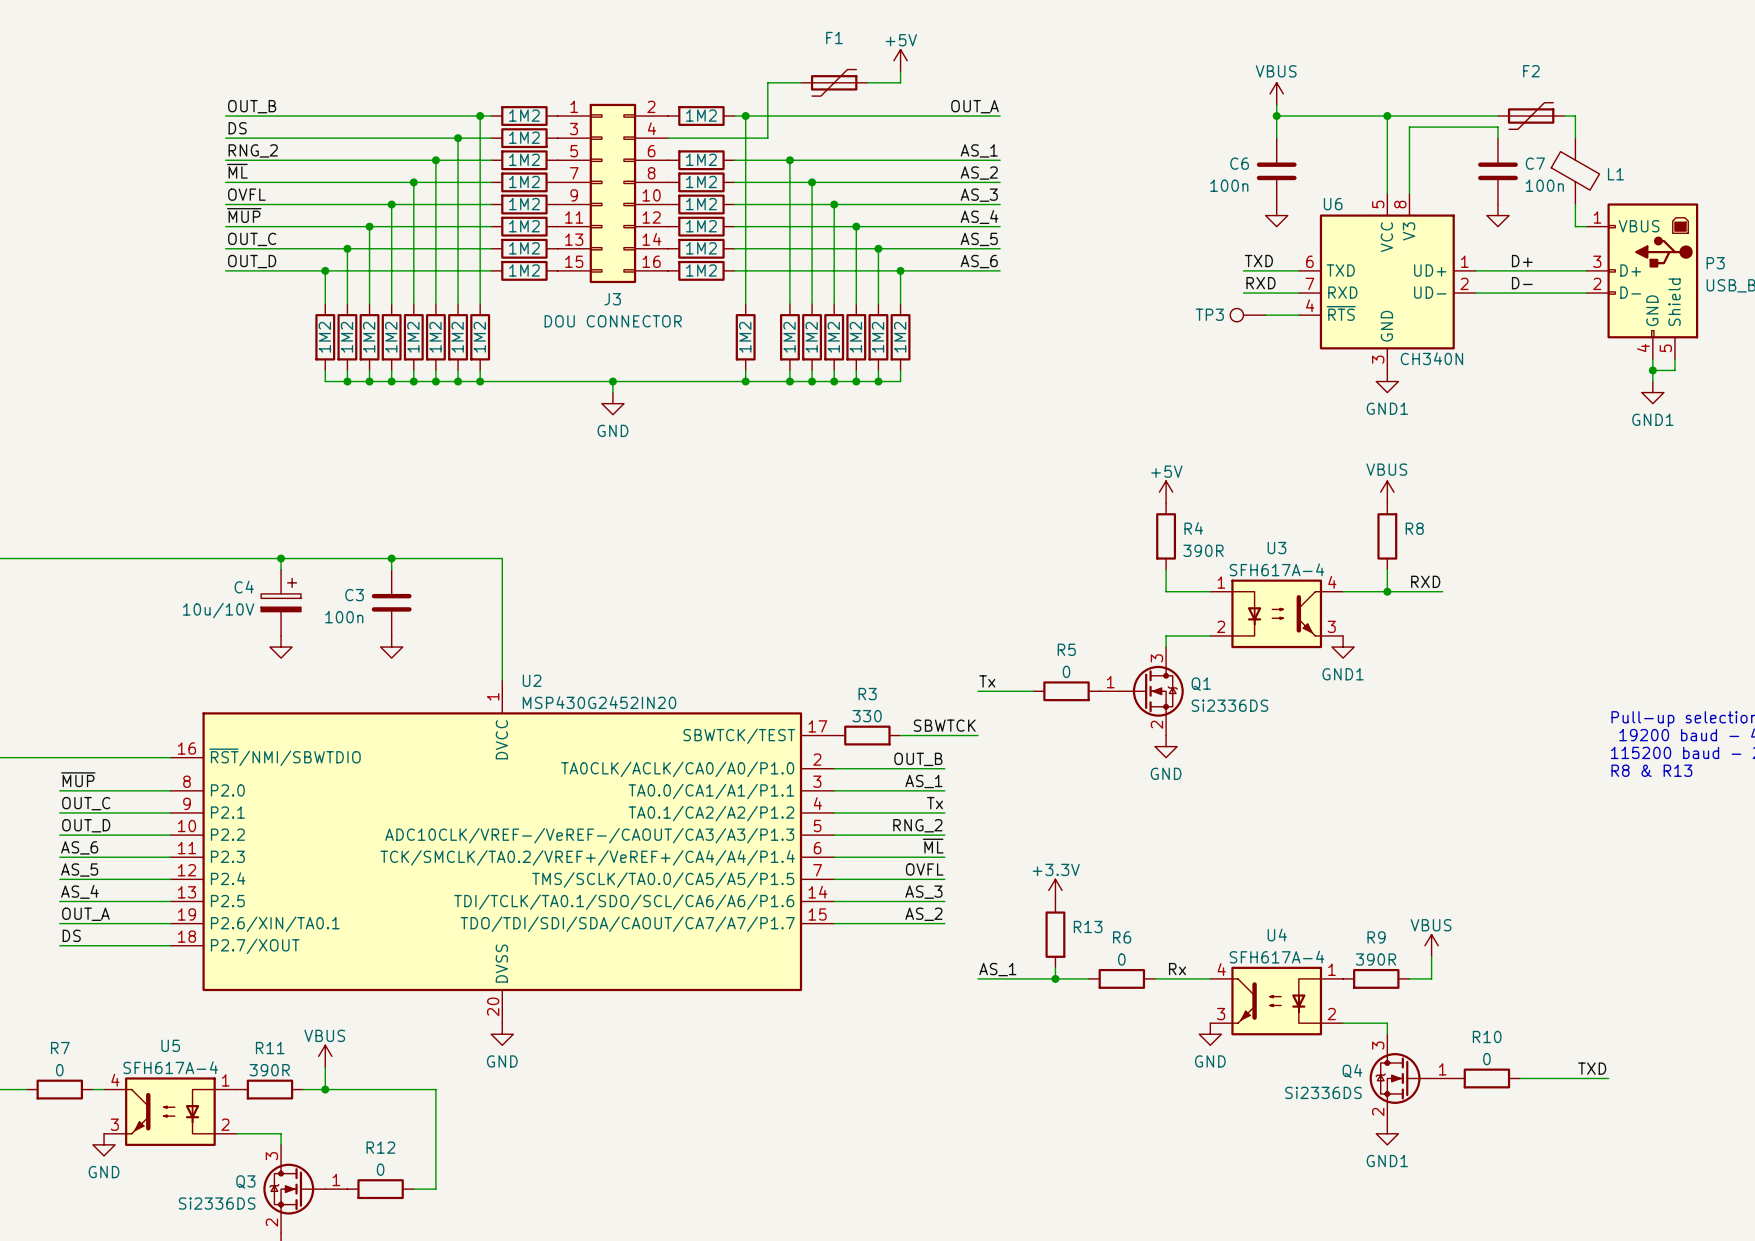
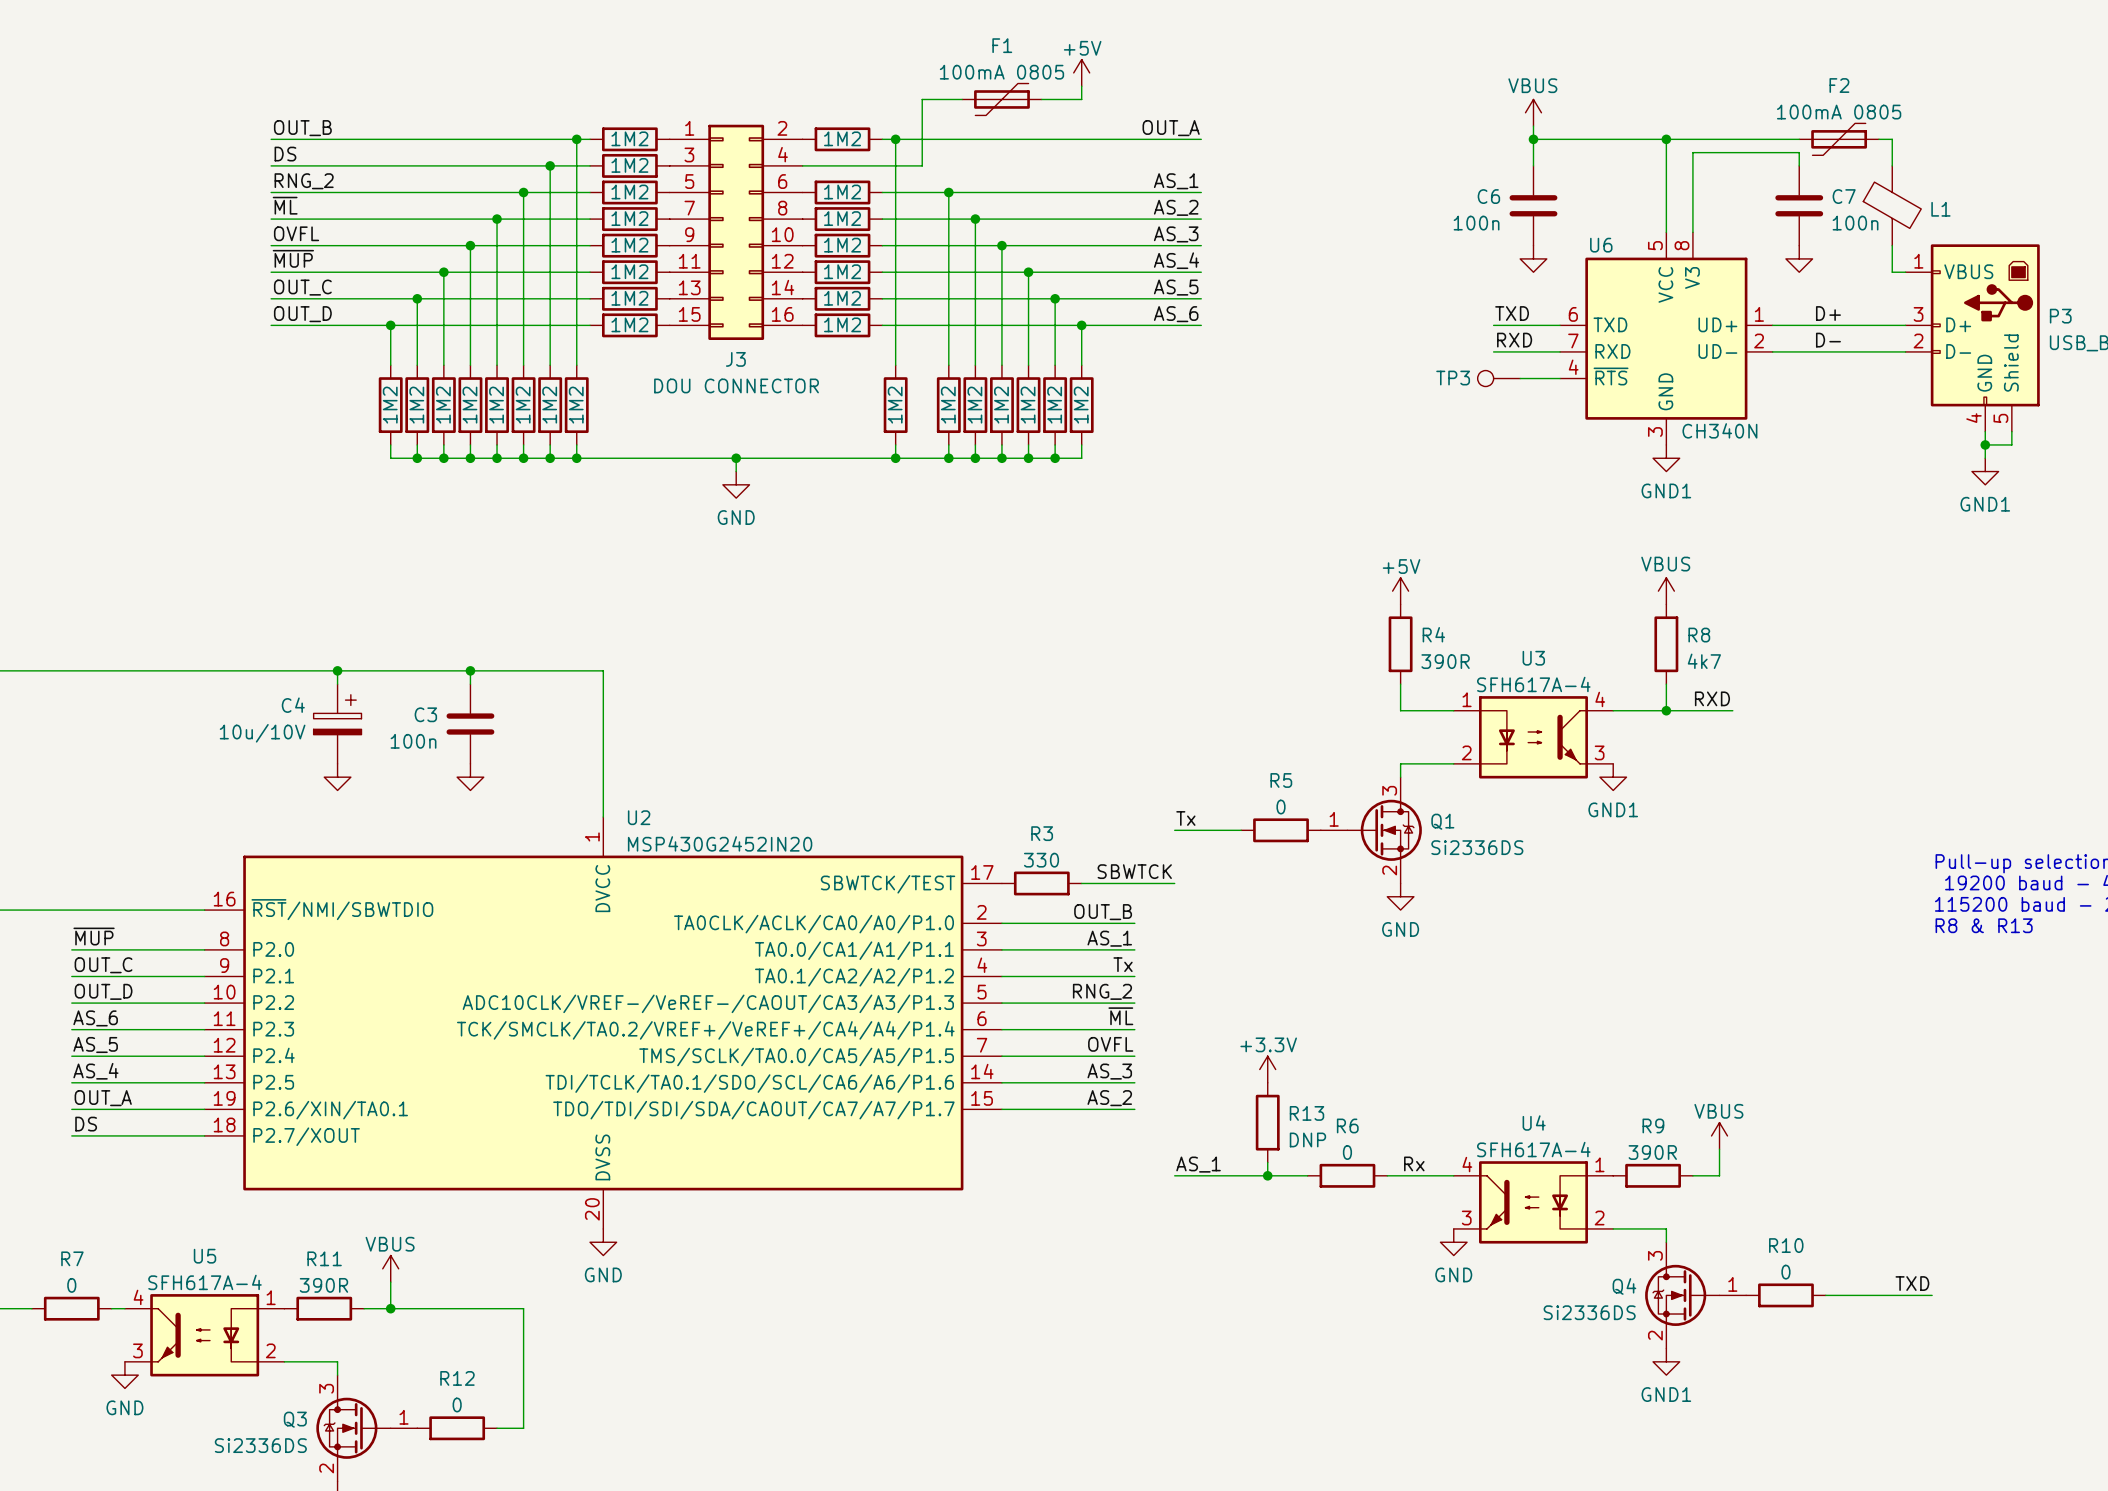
F1 value: none -> 100mA 0805 (1001, 72)
F2 value: none -> 100mA 0805 (1839, 112)
R8 value: none -> 4k7 (1704, 661)
R13 value: none -> DNP (1307, 1139)

